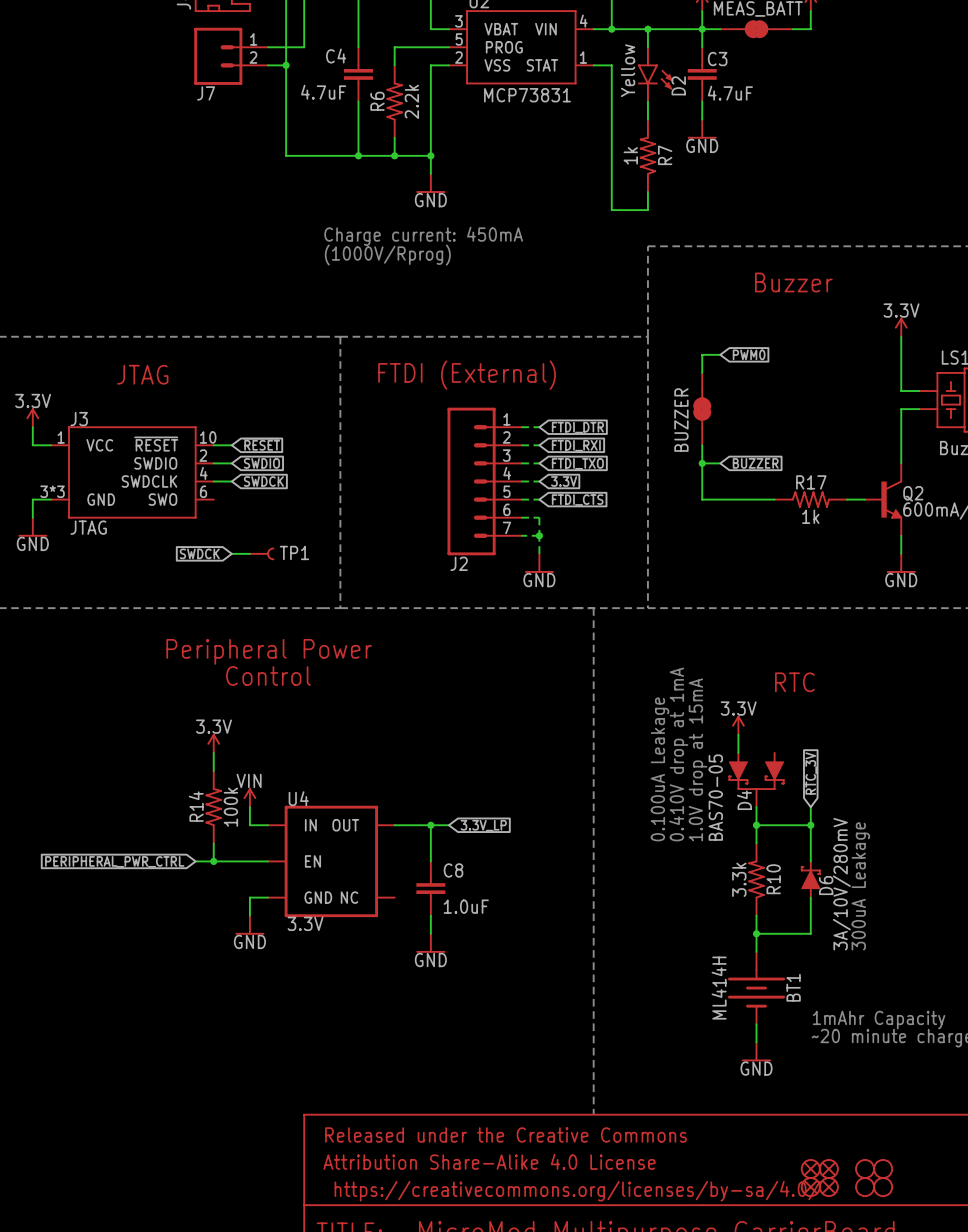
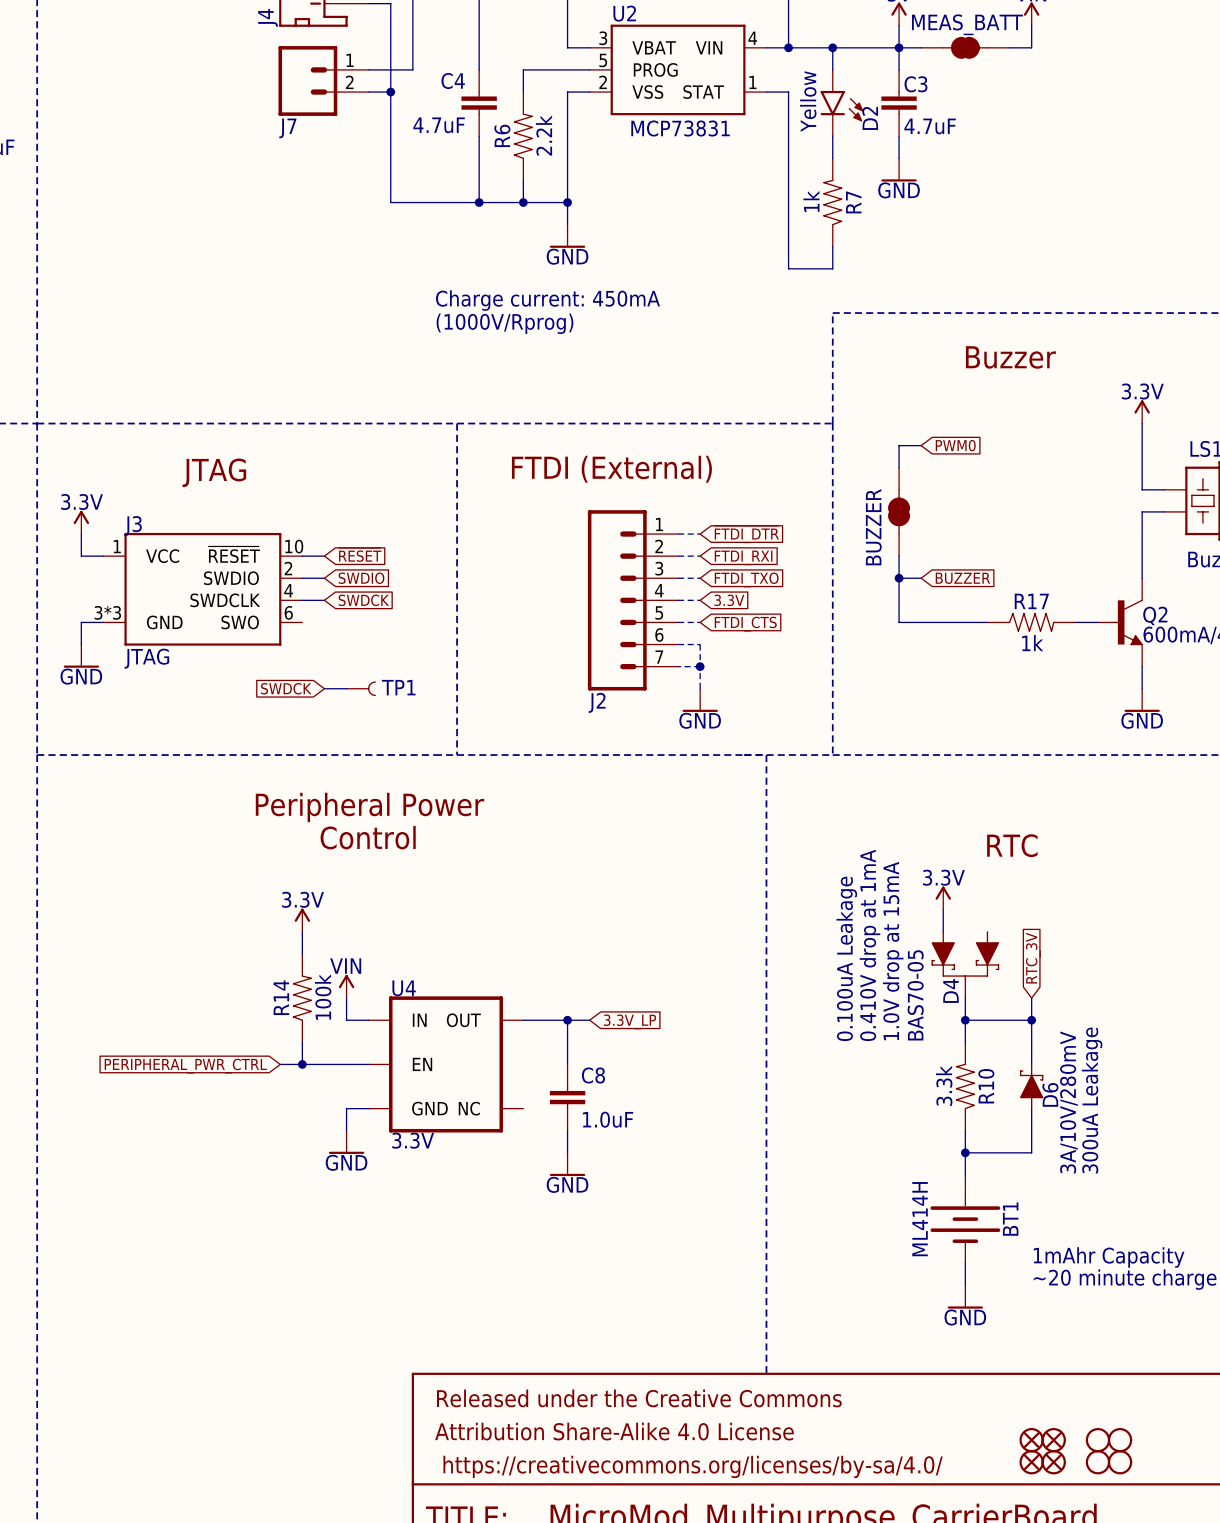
global label: FTDI_DTR (577, 427) -> ~{FTDI_DTR} (746, 534)

